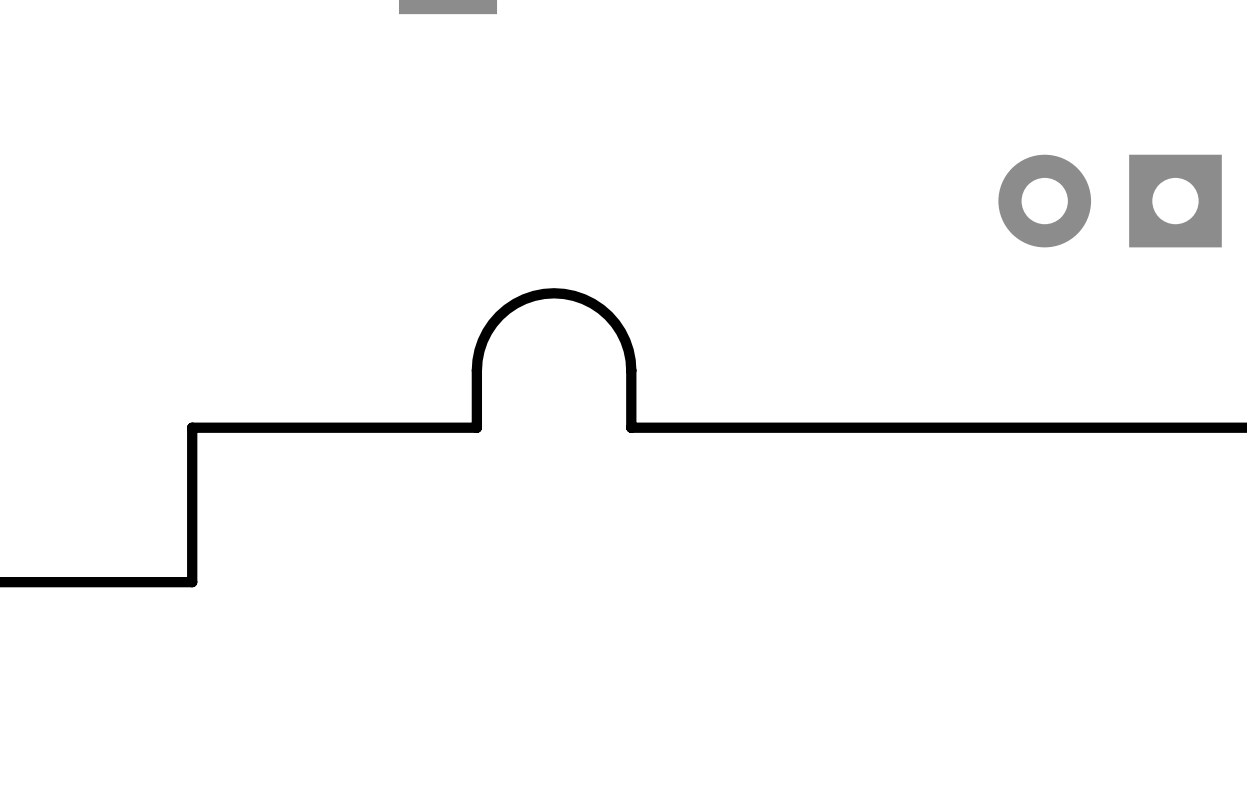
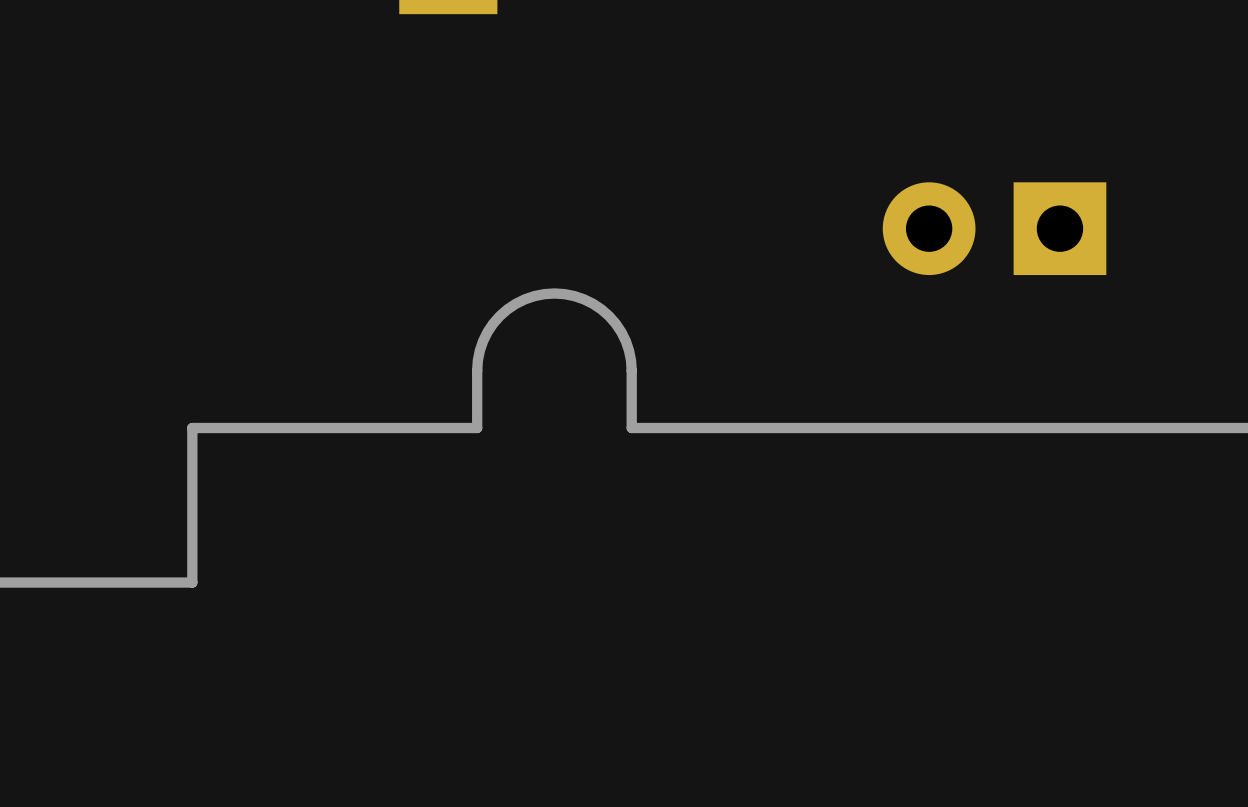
part position: (1110, 201) -> (994, 228)

